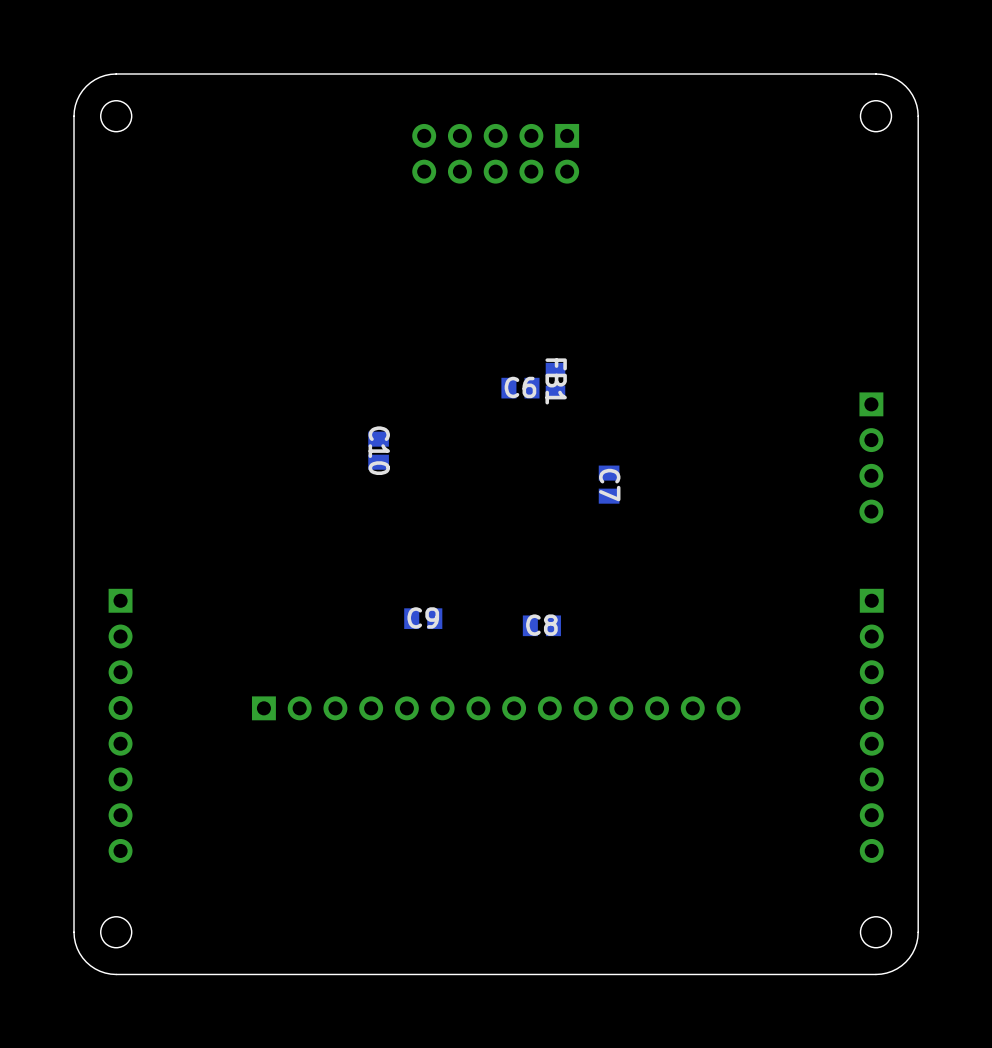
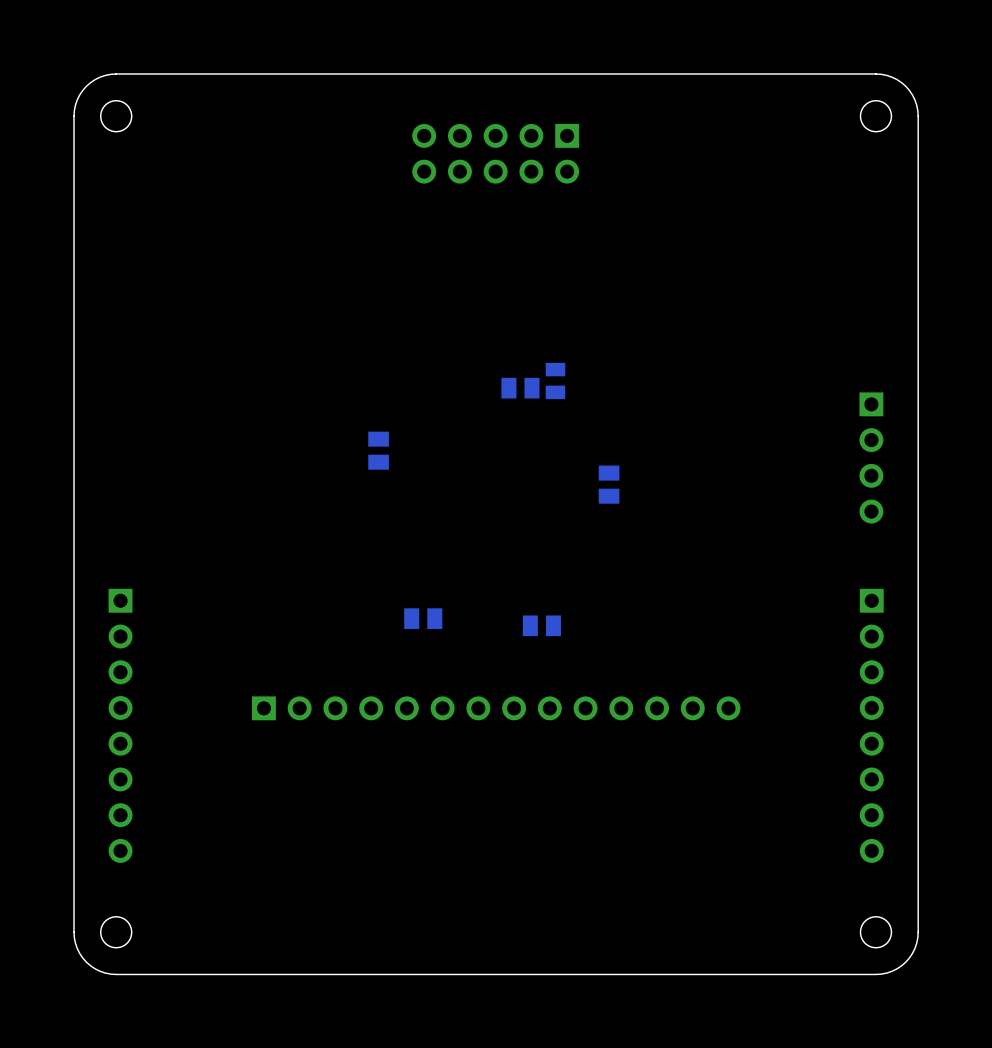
FB1 name: FB1 (556, 381) -> none
C6 name: C6 (520, 387) -> none
C10 name: C10 (379, 450) -> none
C7 name: C7 (609, 485) -> none
C9 name: C9 (423, 617) -> none
C8 name: C8 (541, 625) -> none

